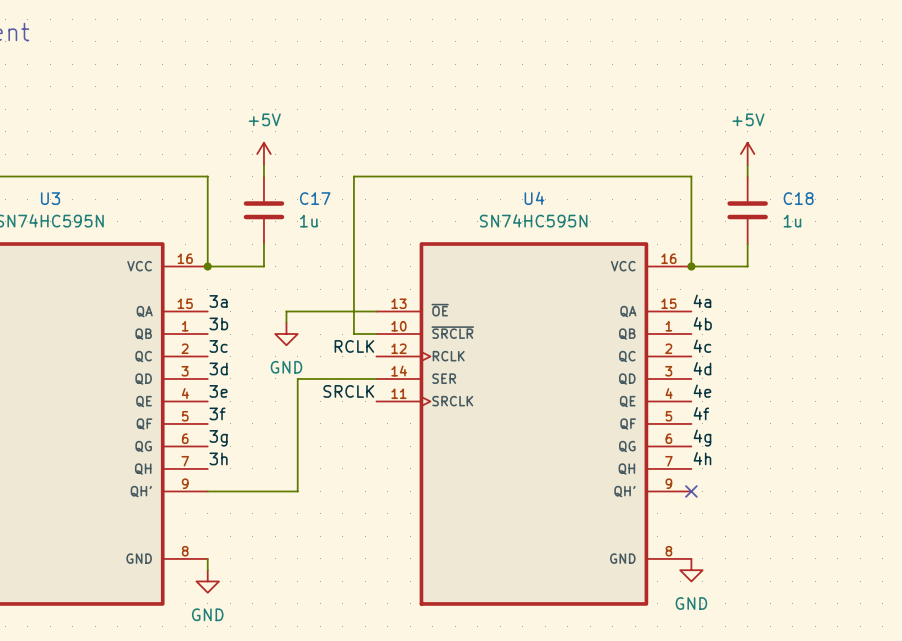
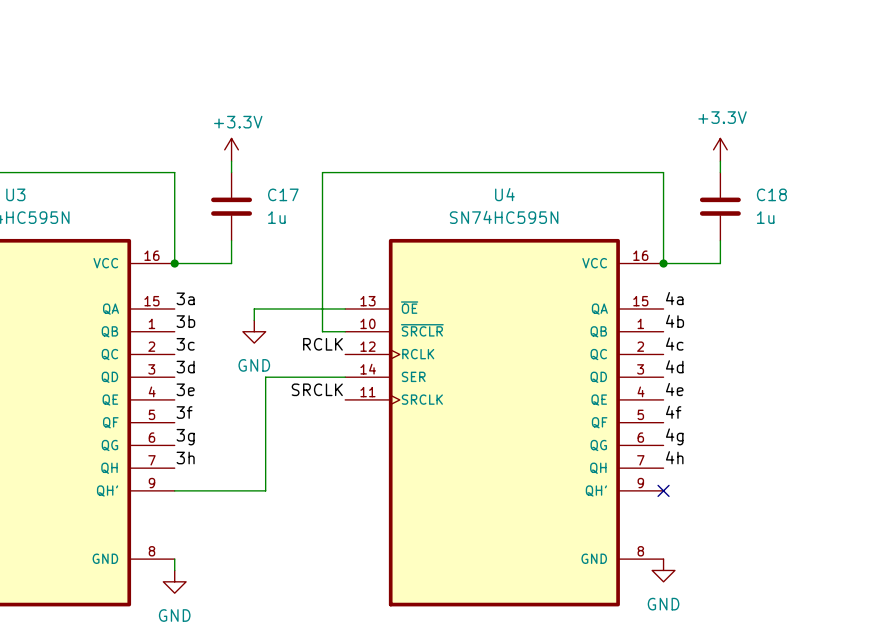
power symbol: +5V (263, 154) -> +3.3V (231, 149)
power symbol: +5V (747, 154) -> +3.3V (720, 149)

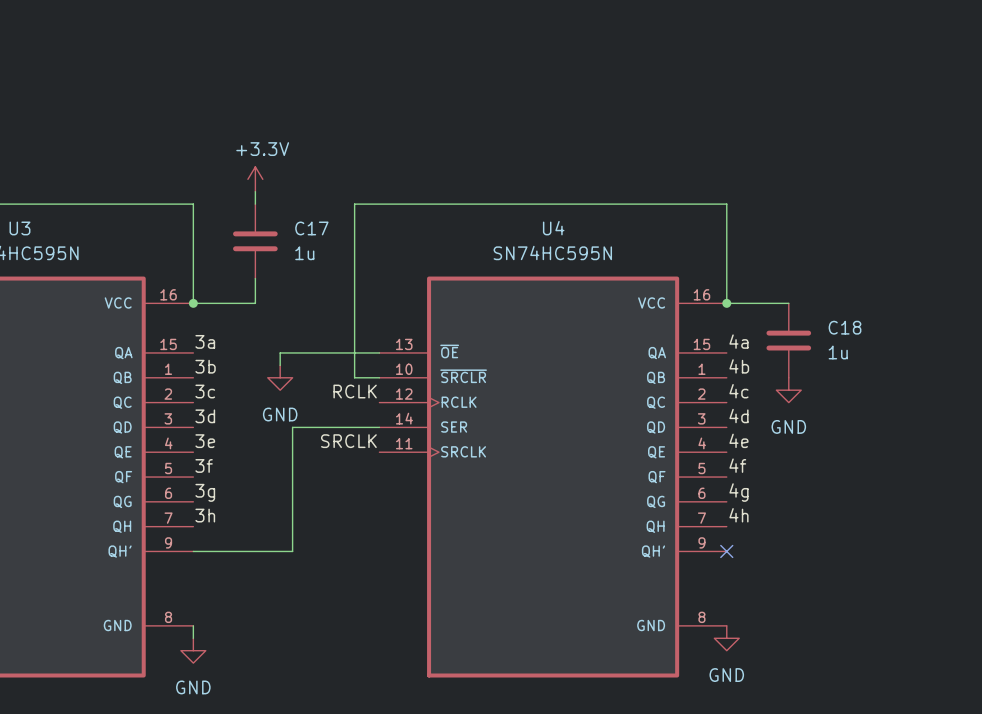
power symbol: +3.3V (720, 149) -> none
wire: (720, 161) (720, 172) -> none
C18 position: (720, 206) -> (788, 340)
wire: (720, 240) (720, 263) -> none
power symbol: none -> GND (788, 390)

